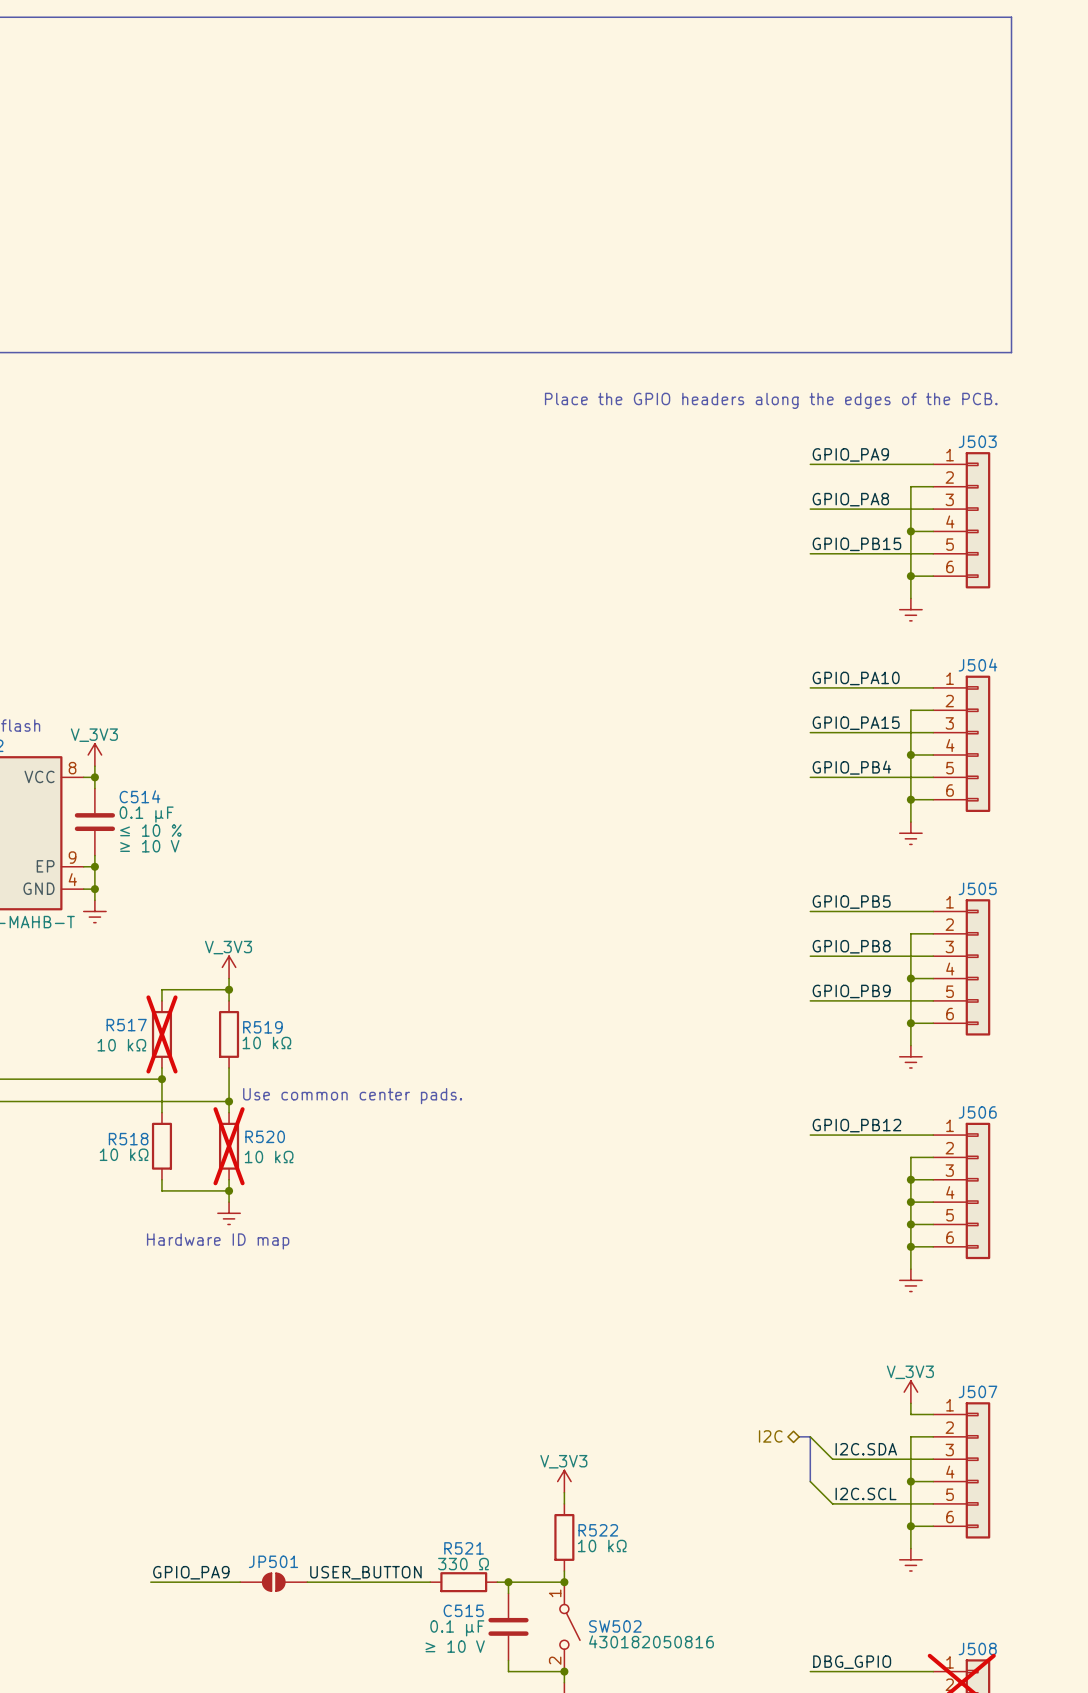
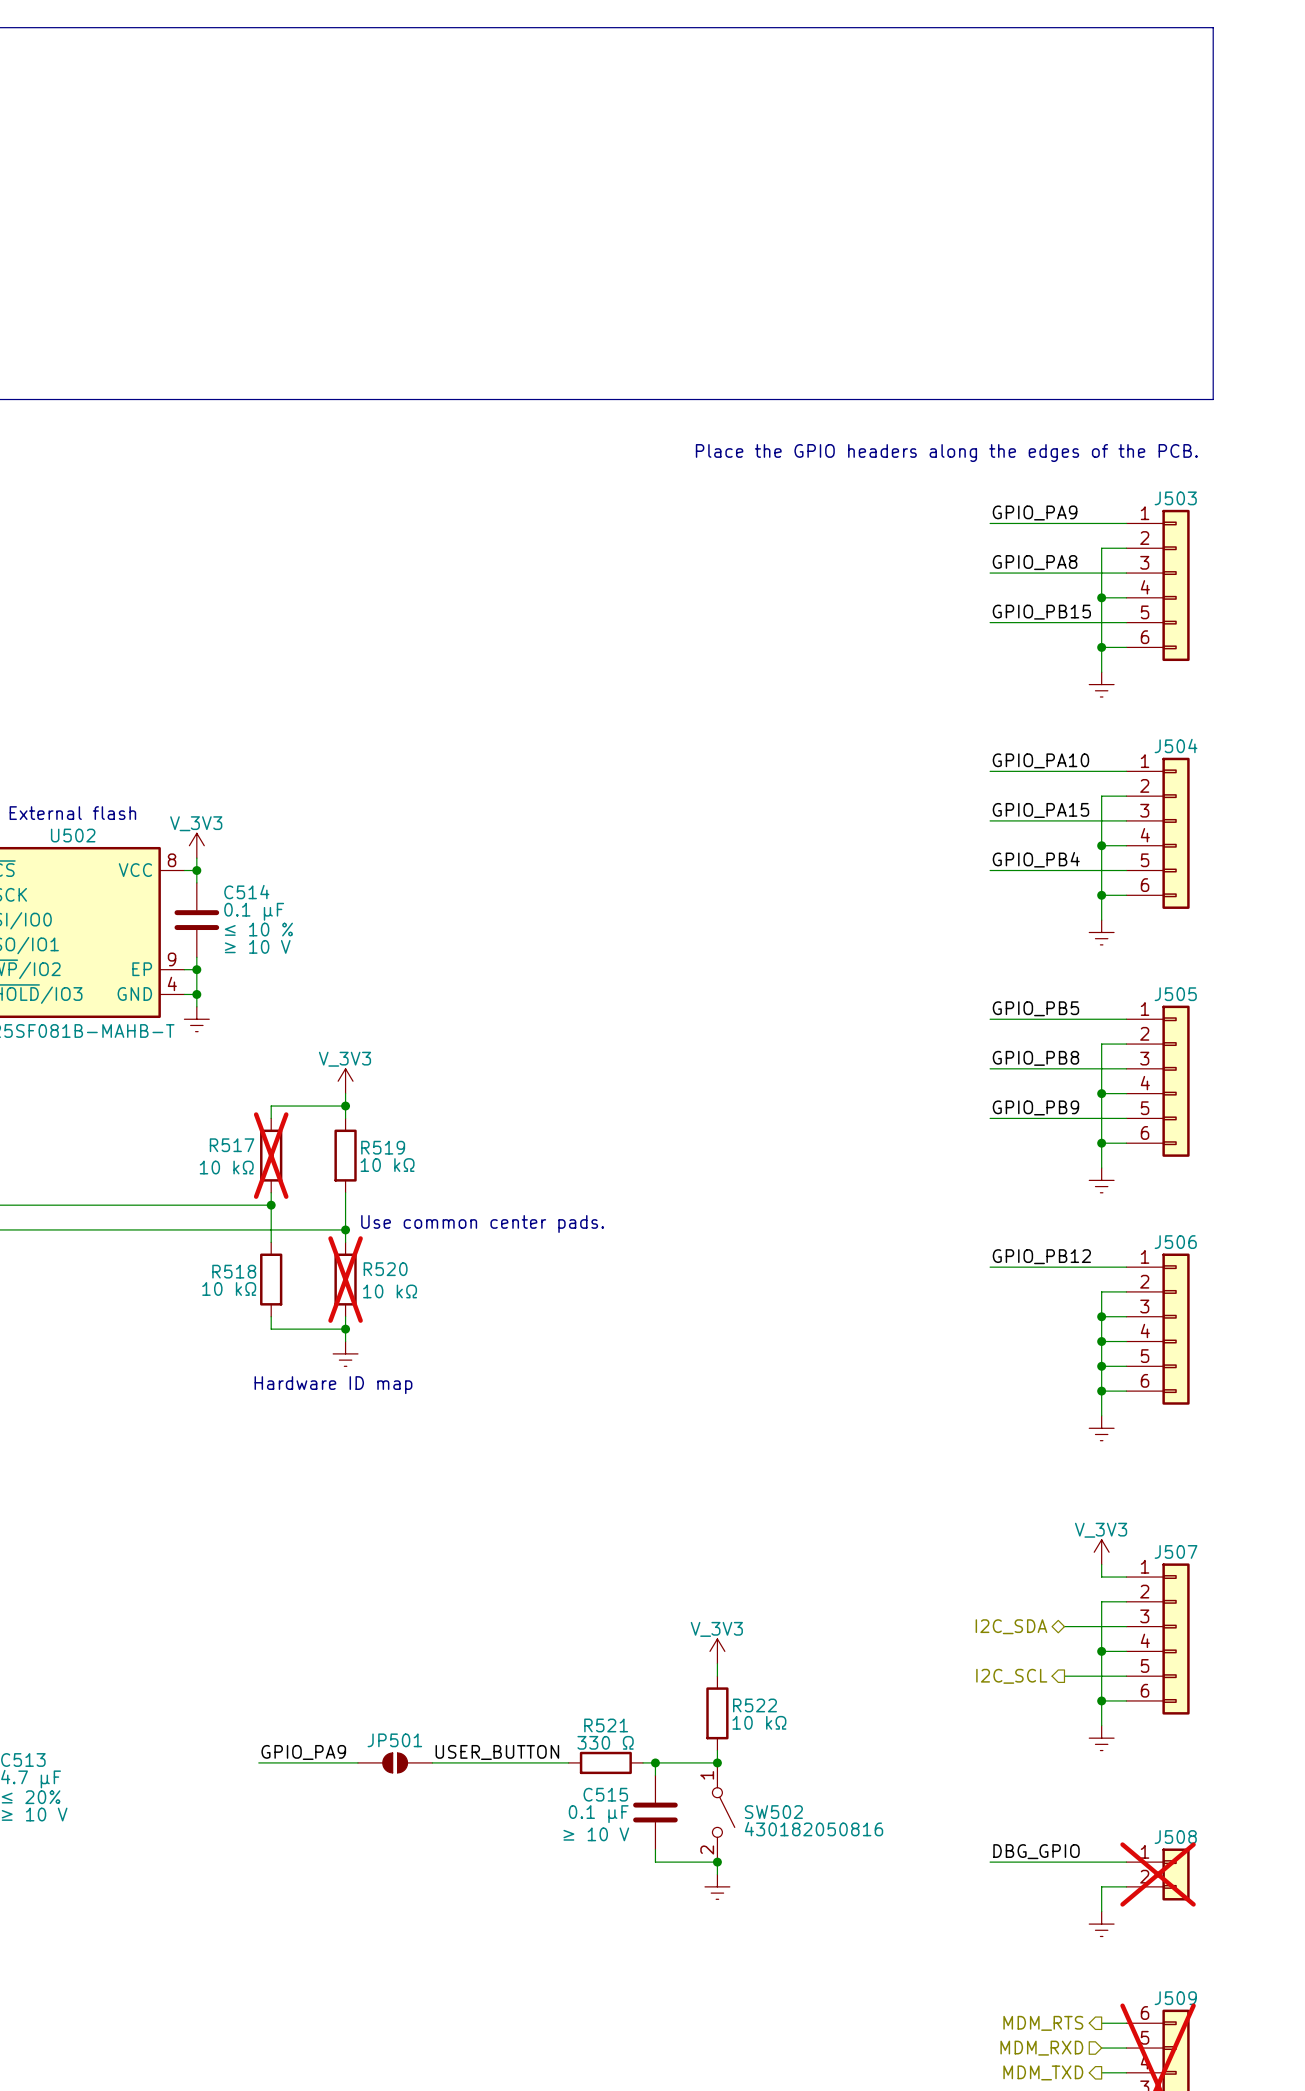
hierarchical label: I2C (770, 1436) -> none
bus: (799, 1436) (810, 1436) (810, 1481) -> none
wire: (810, 1436) (832, 1459) (877, 1459) -> none
label: I2C.SDA (866, 1449) -> none
hierarchical label: none -> I2C_SDA (1011, 1626)
wire: (810, 1481) (832, 1503) (877, 1503) -> none
label: I2C.SCL (866, 1493) -> none
hierarchical label: none -> I2C_SCL (1011, 1676)

